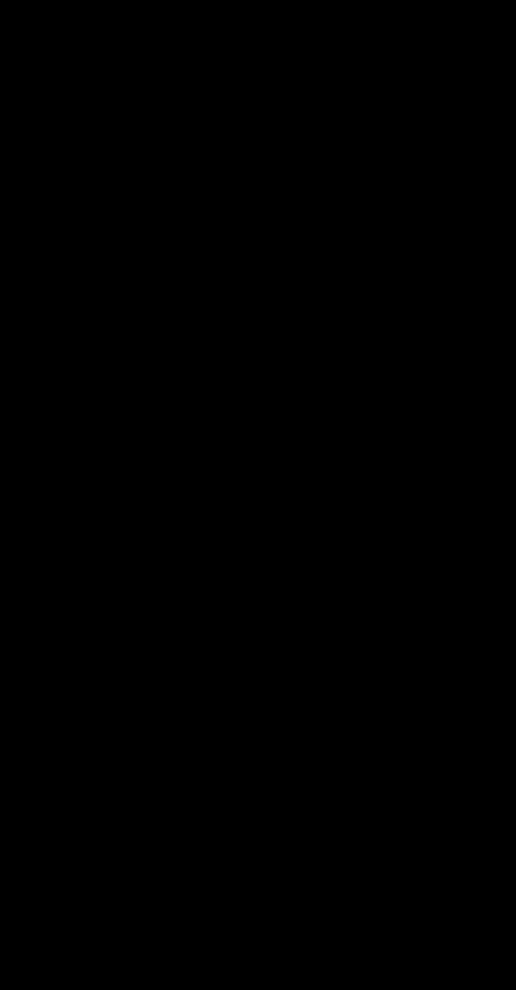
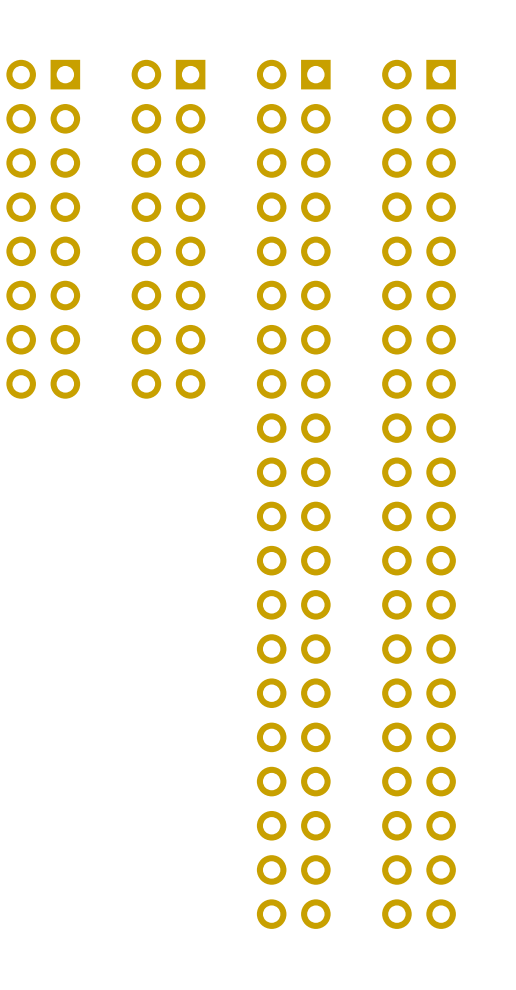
part: none -> (43, 229)
part: none -> (168, 229)
part: none -> (293, 494)
part: none -> (419, 494)

